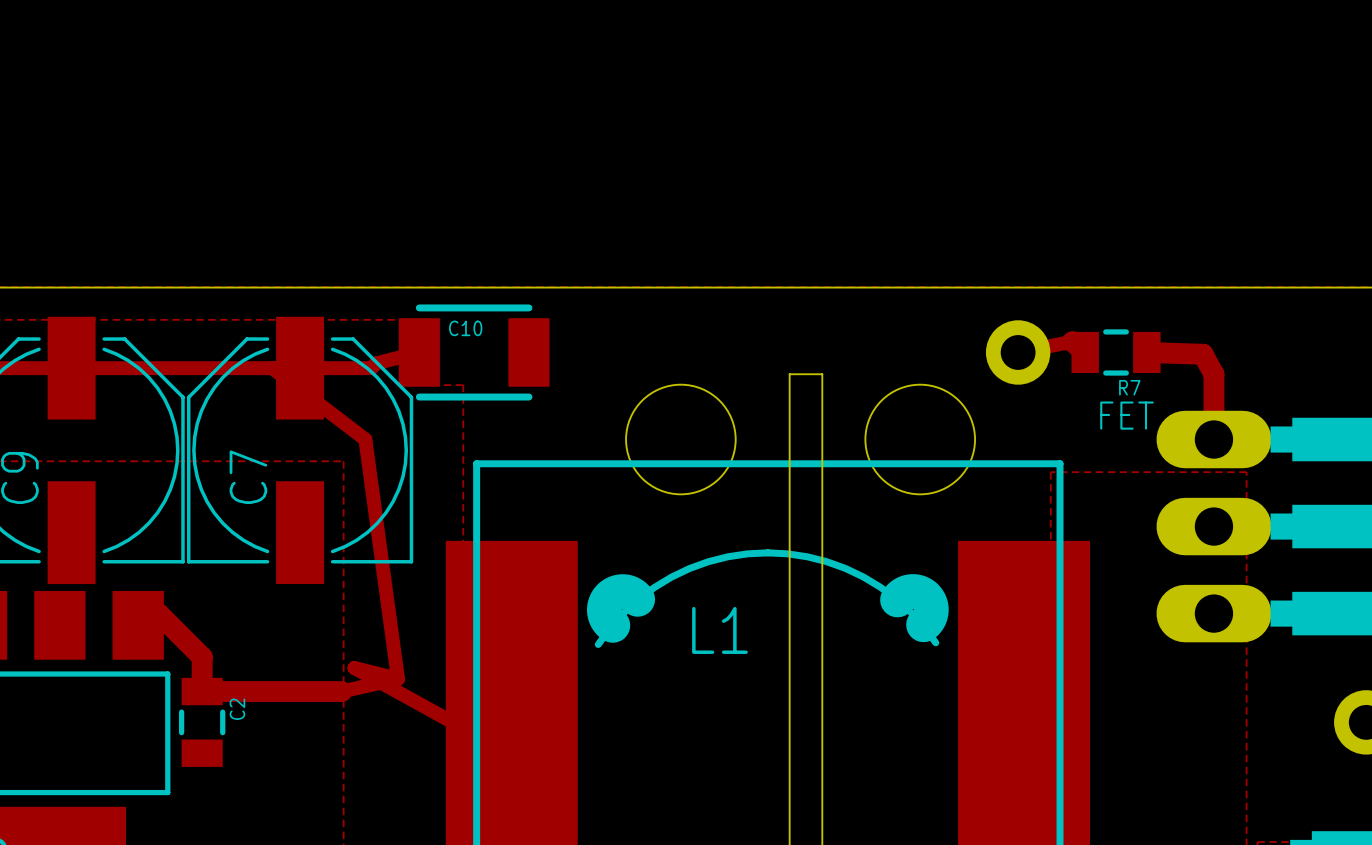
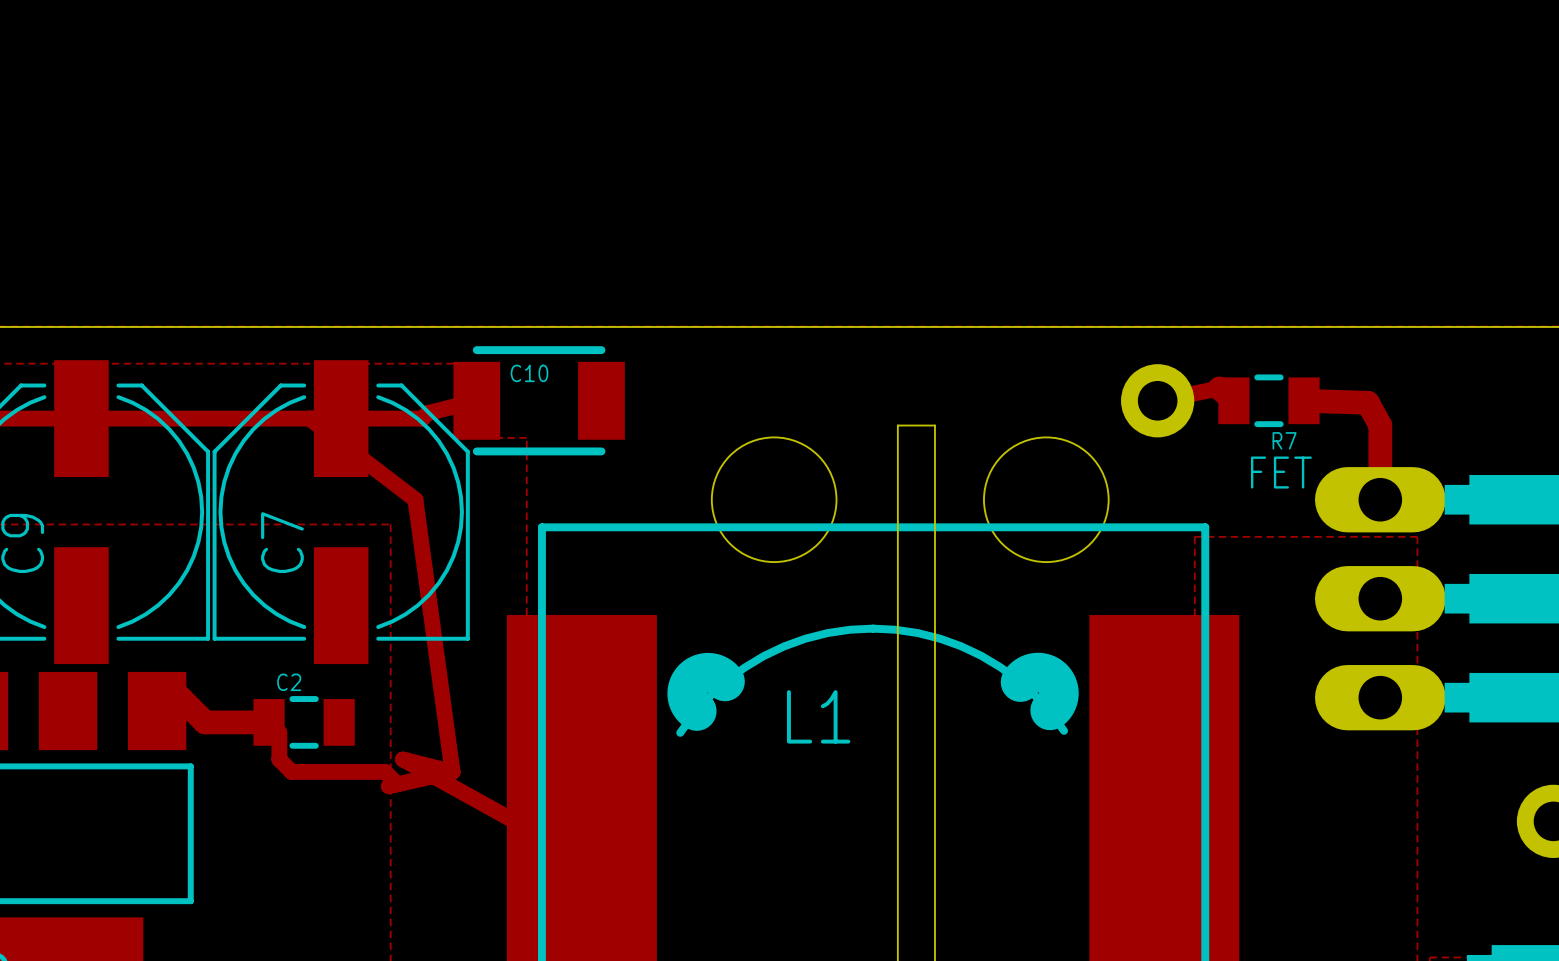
track: (180, 635) (202, 657) (202, 691) (341, 691) -> (205, 722) (269, 722) (279, 732) (279, 759) (291, 771) (385, 771) (397, 784)
C2 rotation: 0° (202, 722) -> 90° clockwise (304, 722)
C2 position: (202, 722) -> (304, 722)

